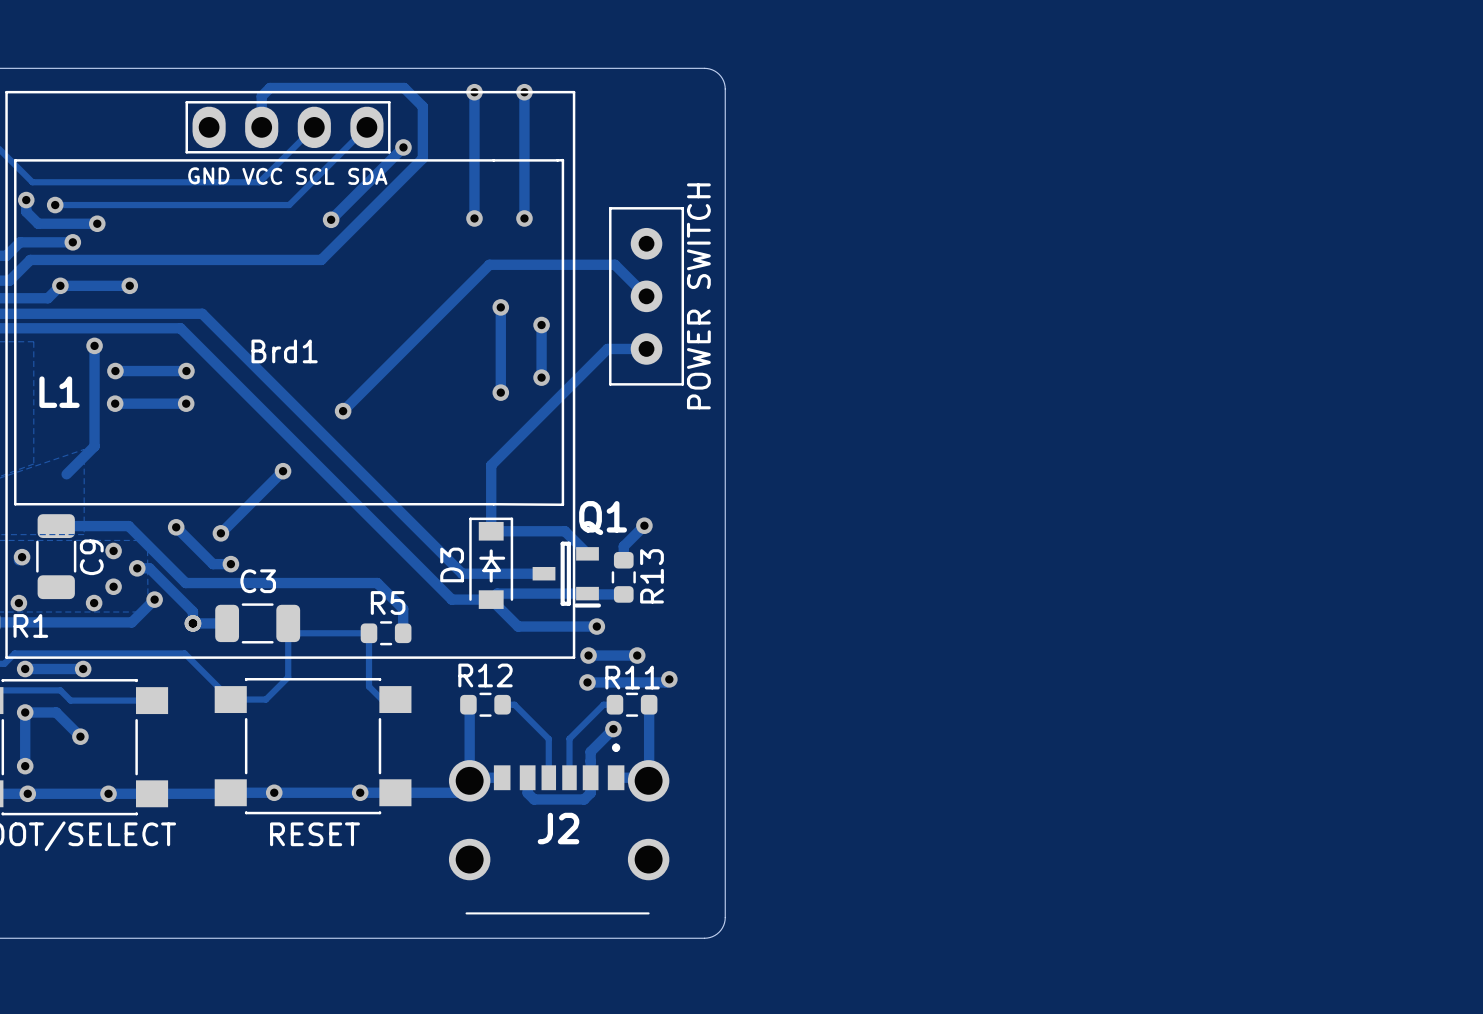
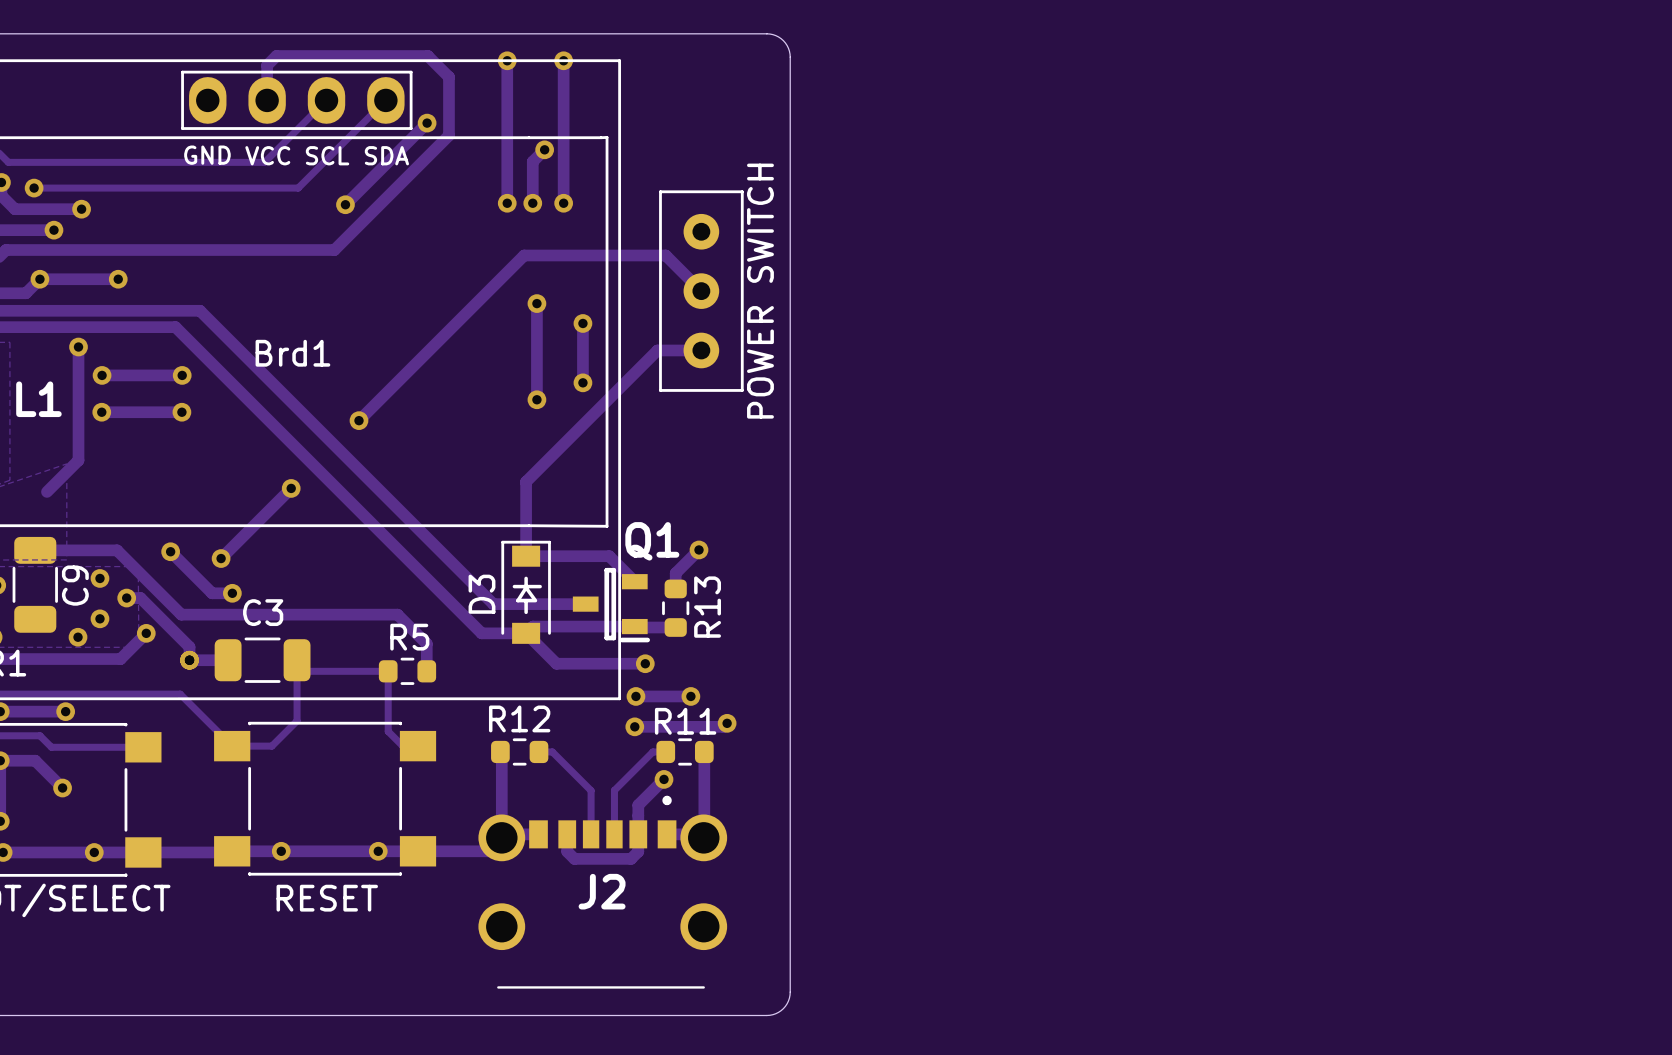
track: none -> (544, 149) (532, 161) (532, 203)
via: none -> (544, 149)
via: none -> (532, 203)

